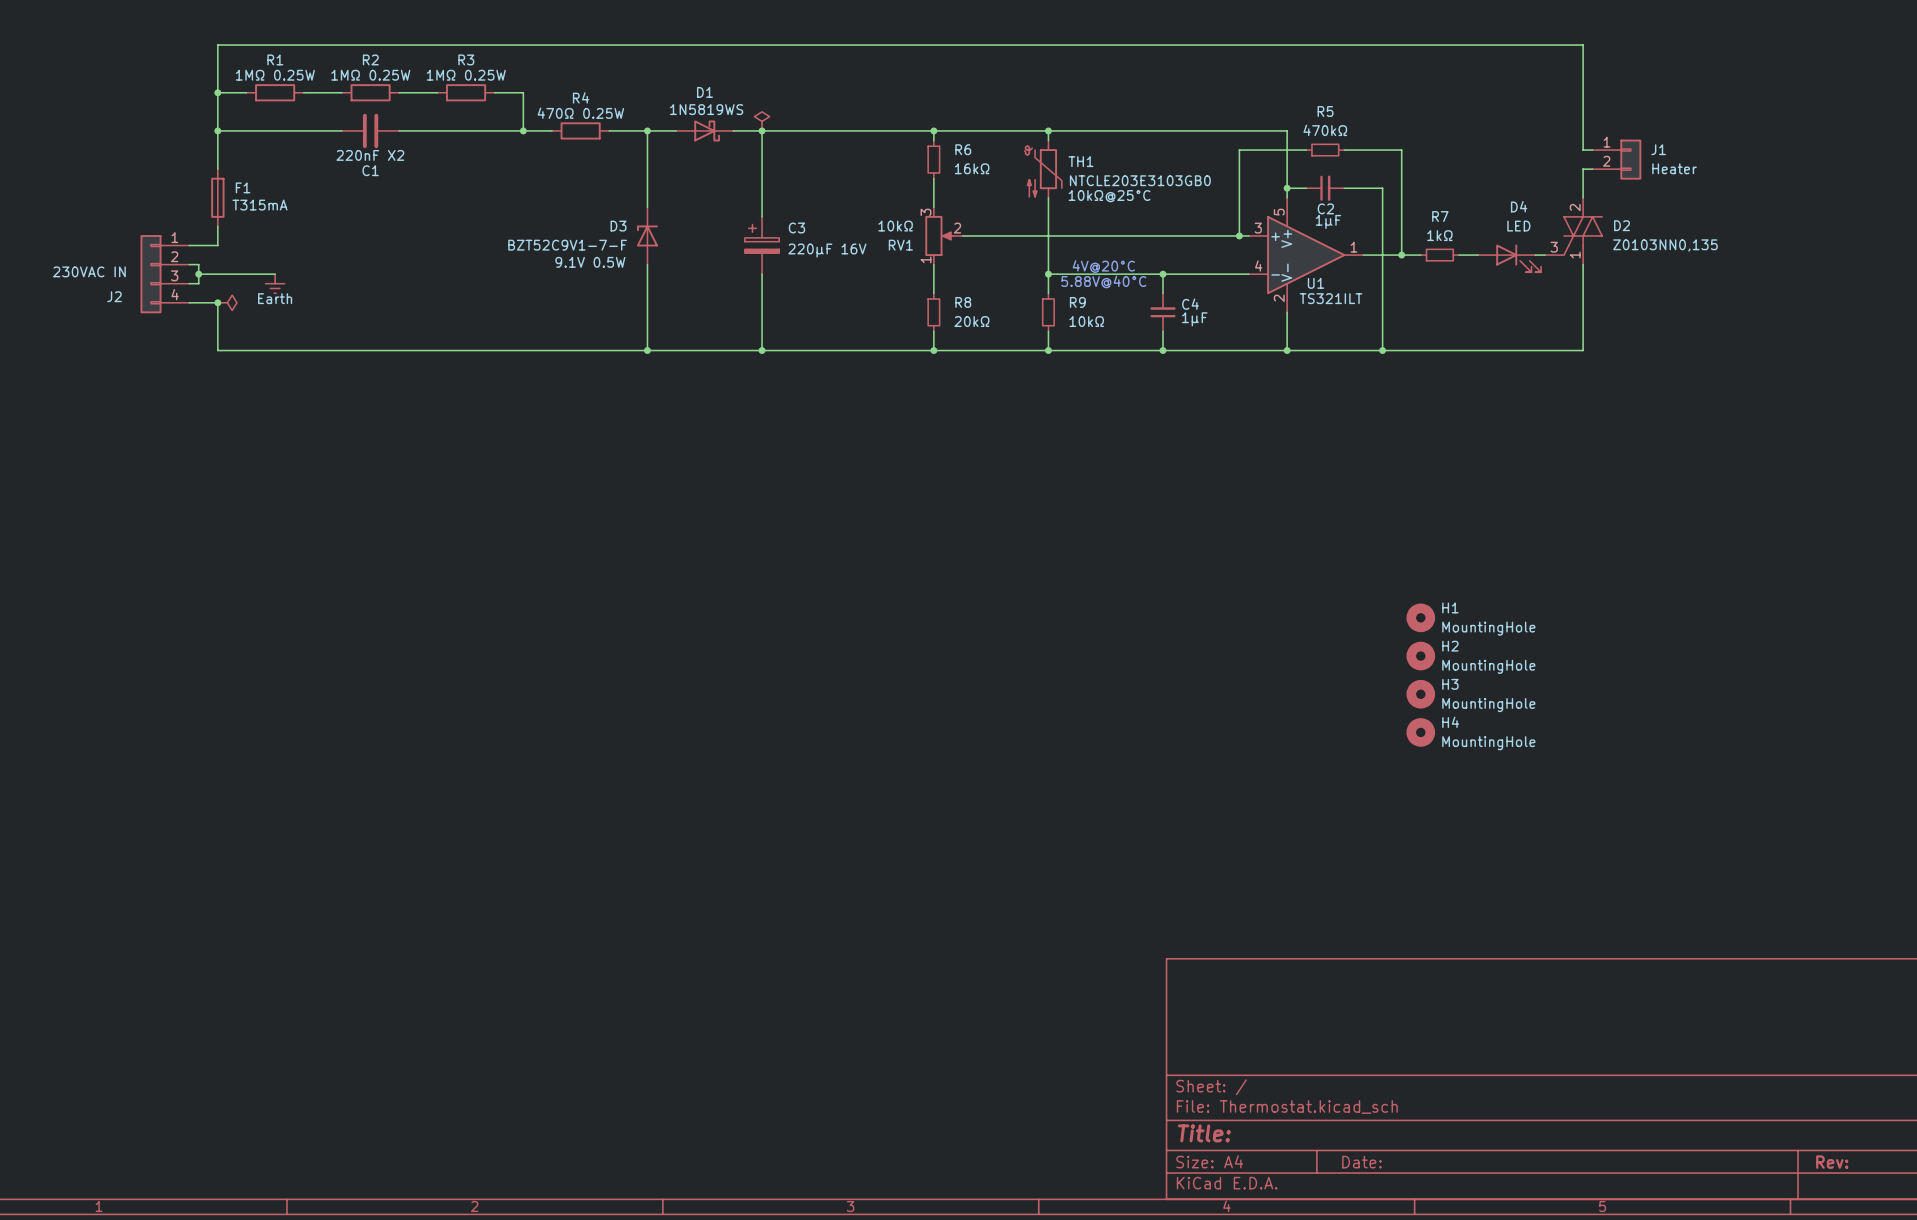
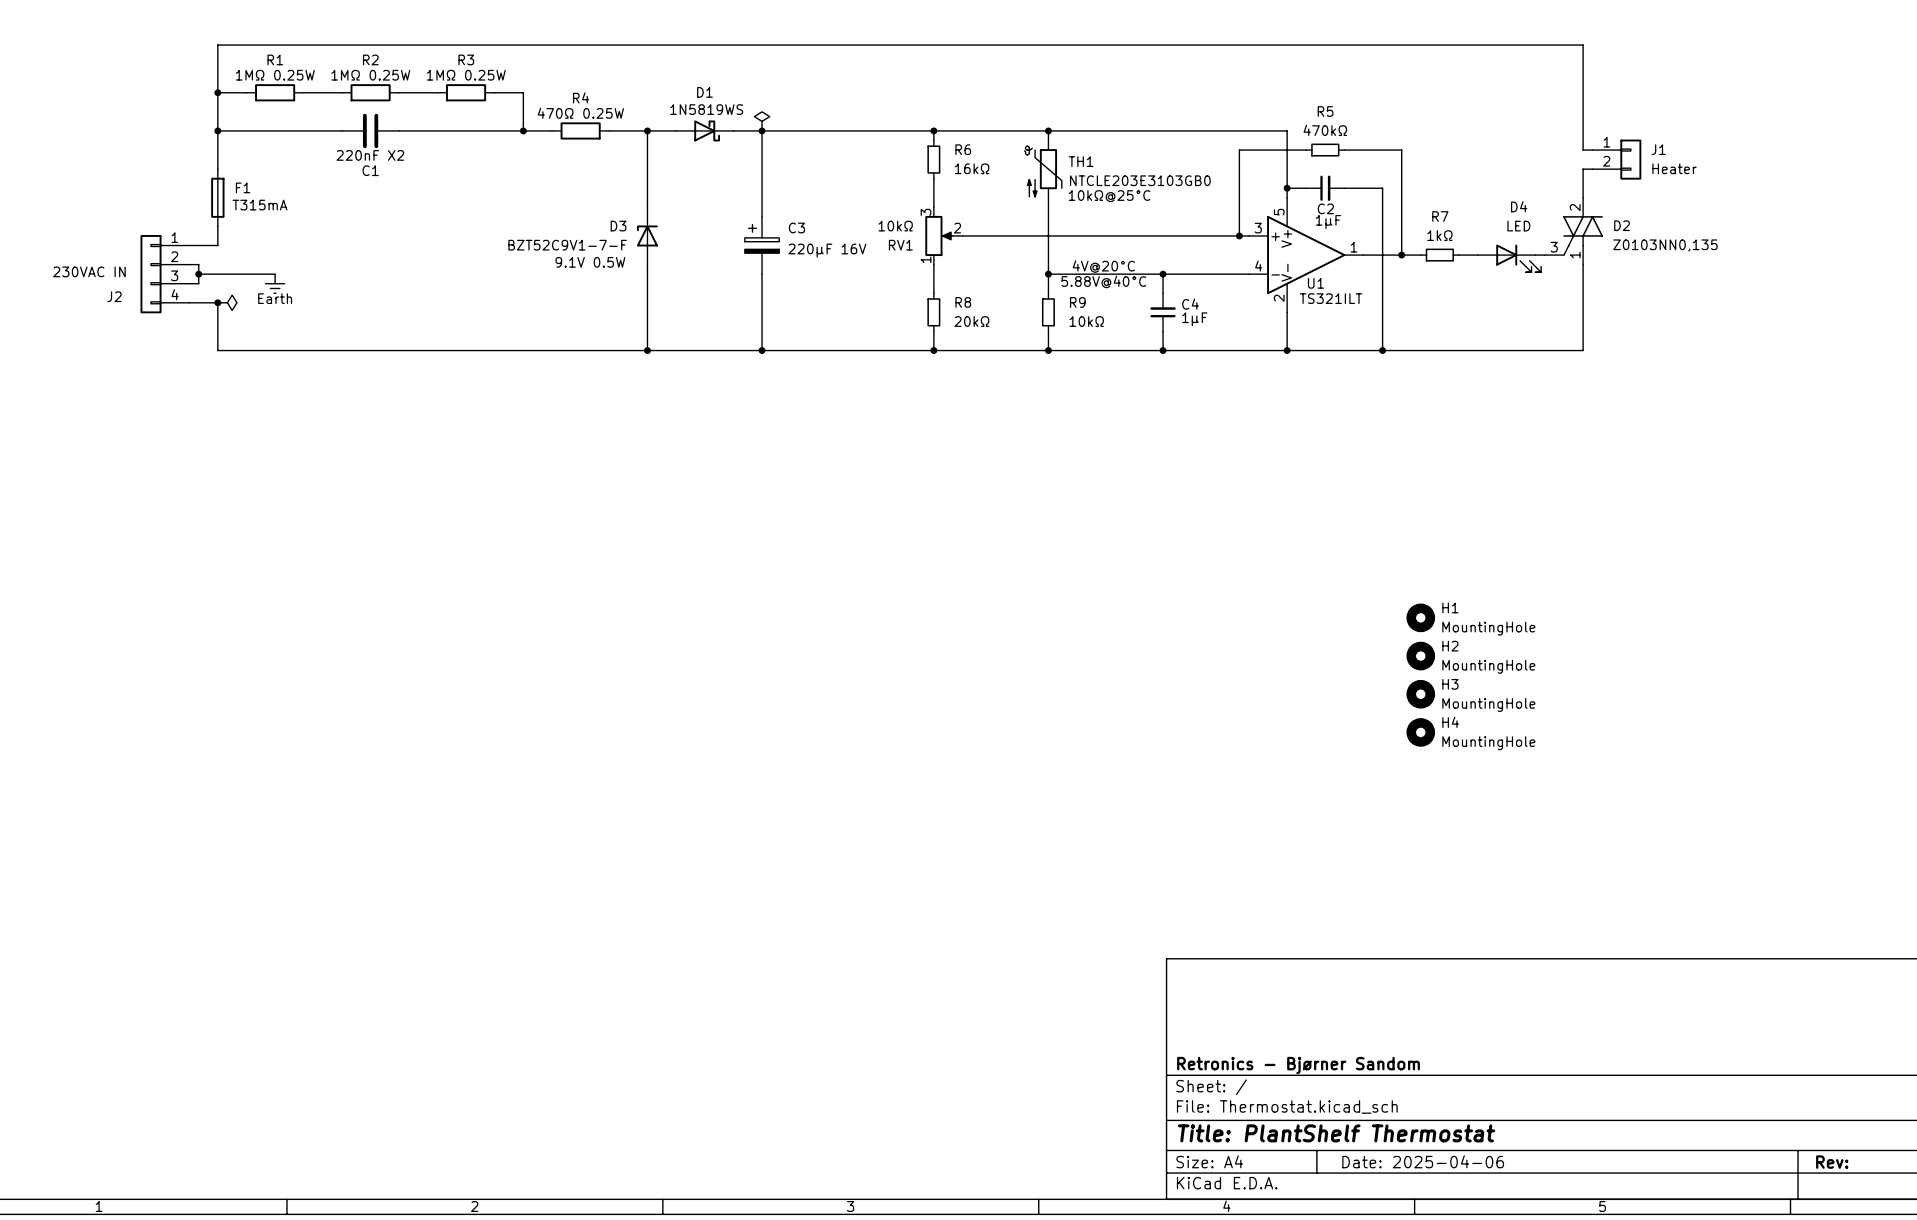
title block: none -> Retronics - Bjørner Sandom (1298, 1065)
title block: Title: (1204, 1133) -> Title: PlantShelf Thermostat (1336, 1133)
title block: Date: (1361, 1162) -> Date: 2025-04-06 (1423, 1161)

